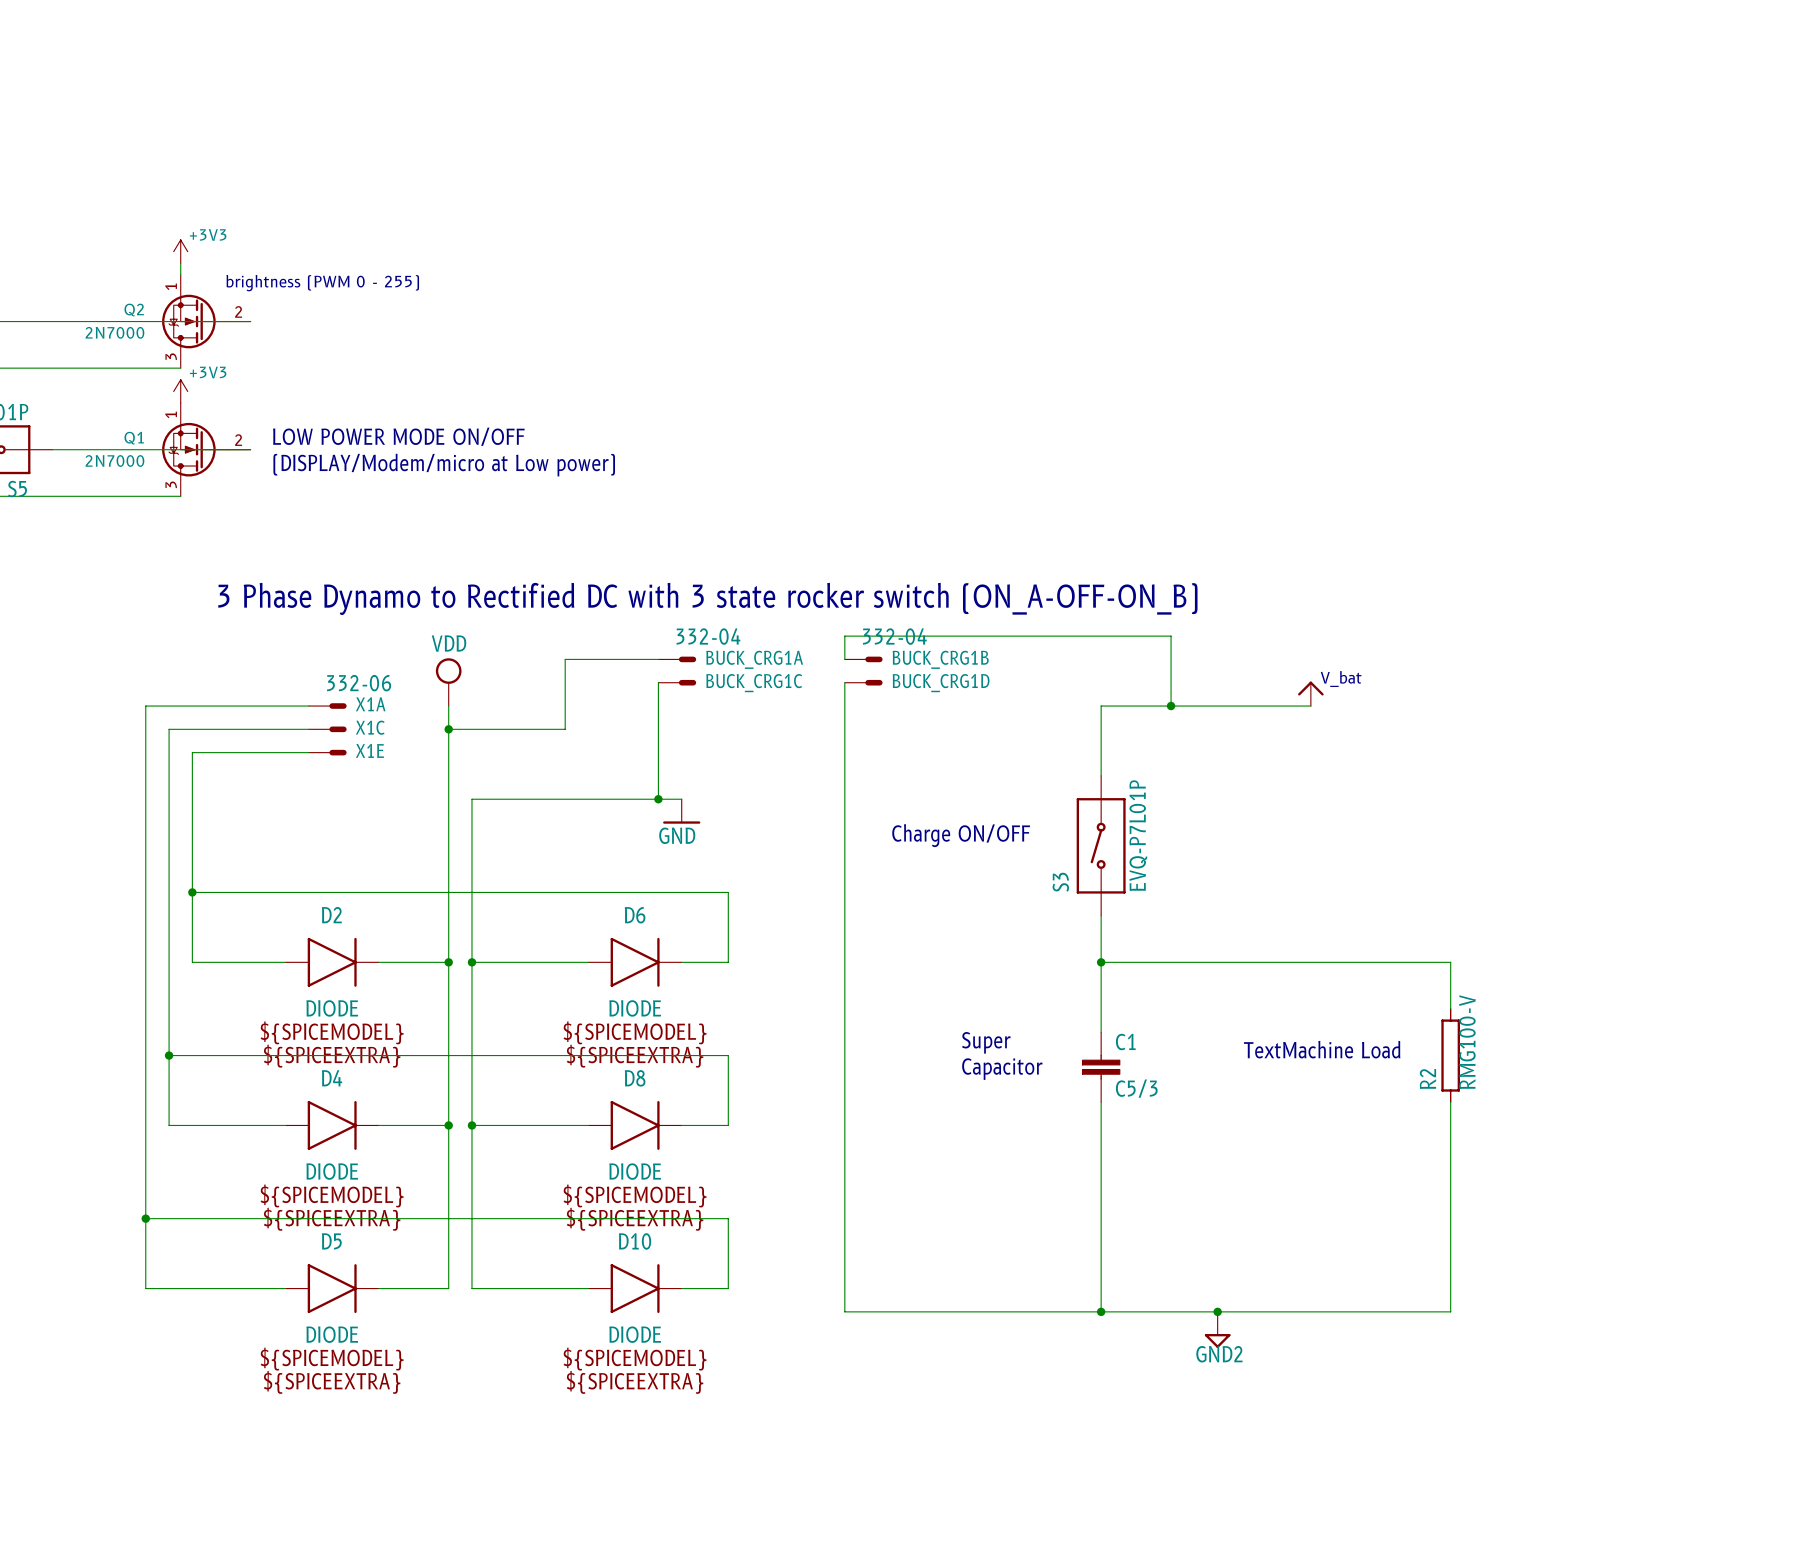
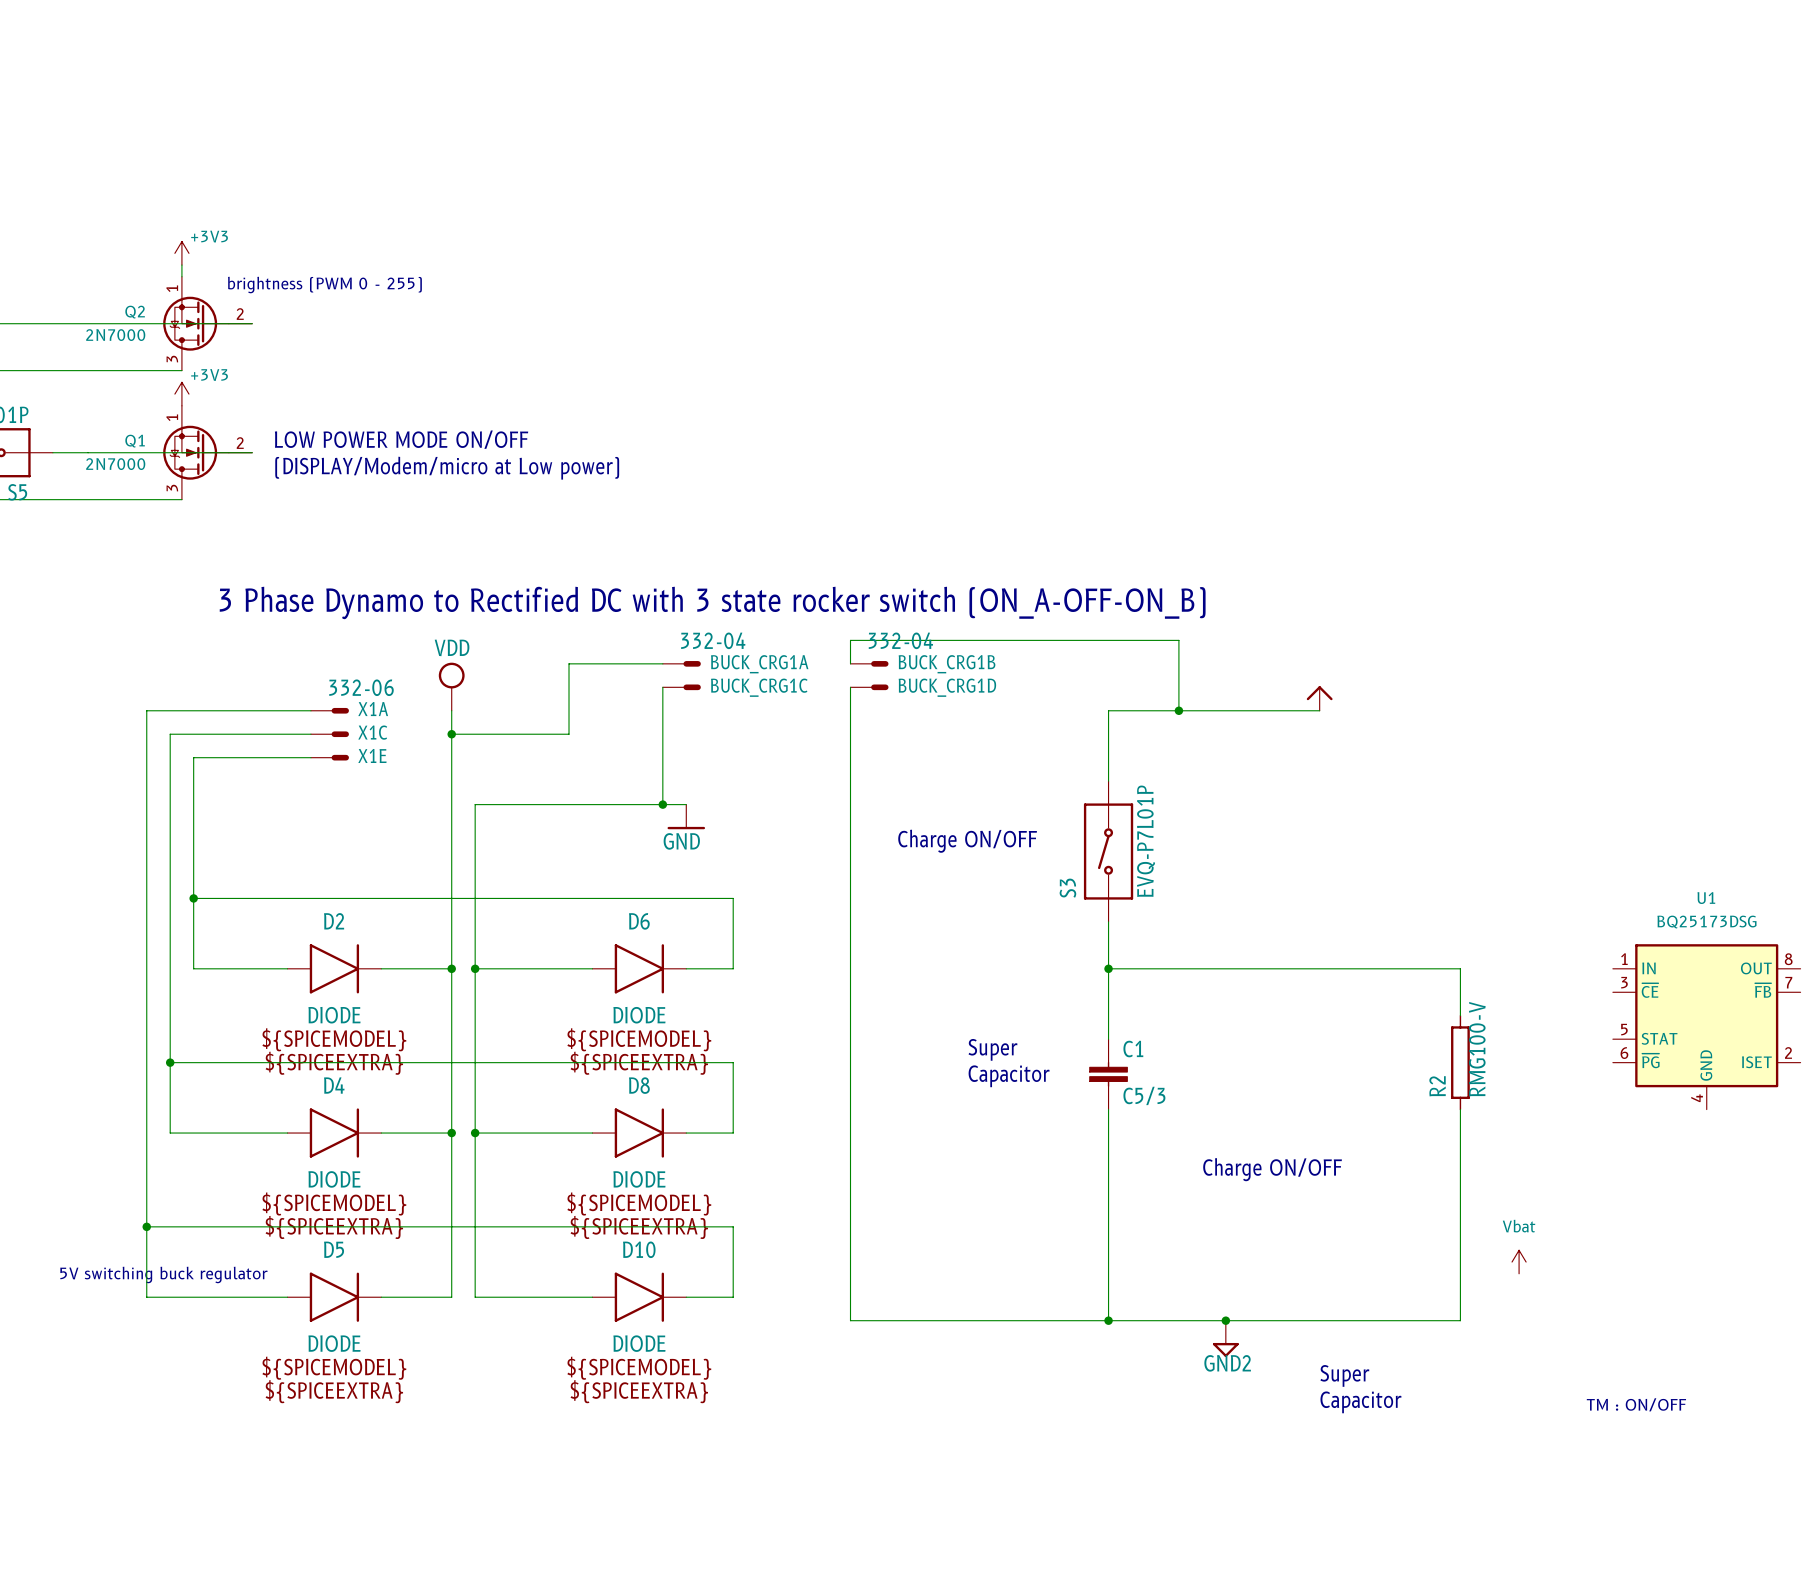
text: V_bat (1341, 679) -> none
U1: none -> BQ25173DSG (1706, 1026)
text: TextMachine Load (1322, 1049) -> none
text: none -> Charge ON/OFF (1272, 1169)
power symbol: none -> Vbat (1519, 1262)
text: none -> 5V switching buck regulator (163, 1274)
text: none -> Super (1344, 1375)
text: none -> Capacitor (1360, 1402)
text: none -> TM : ON/OFF (1636, 1404)

